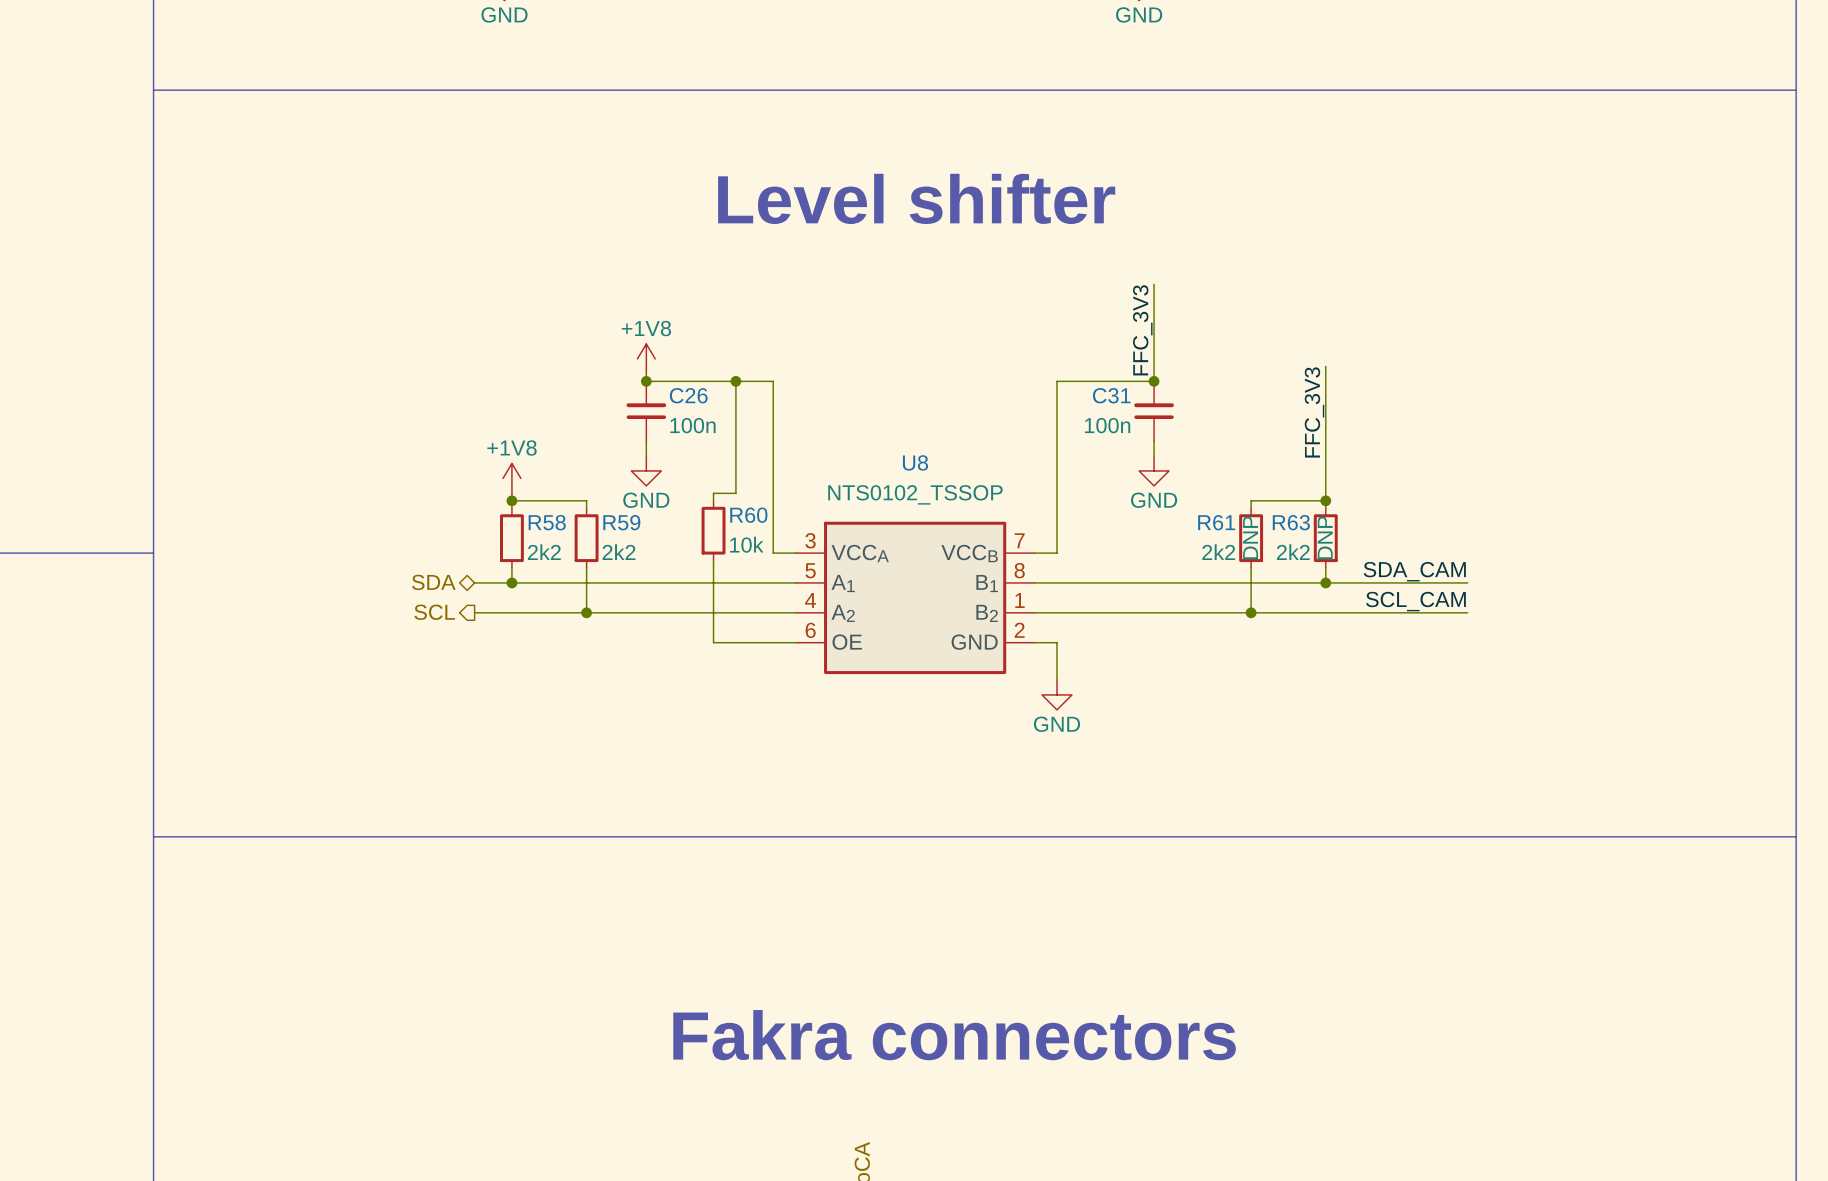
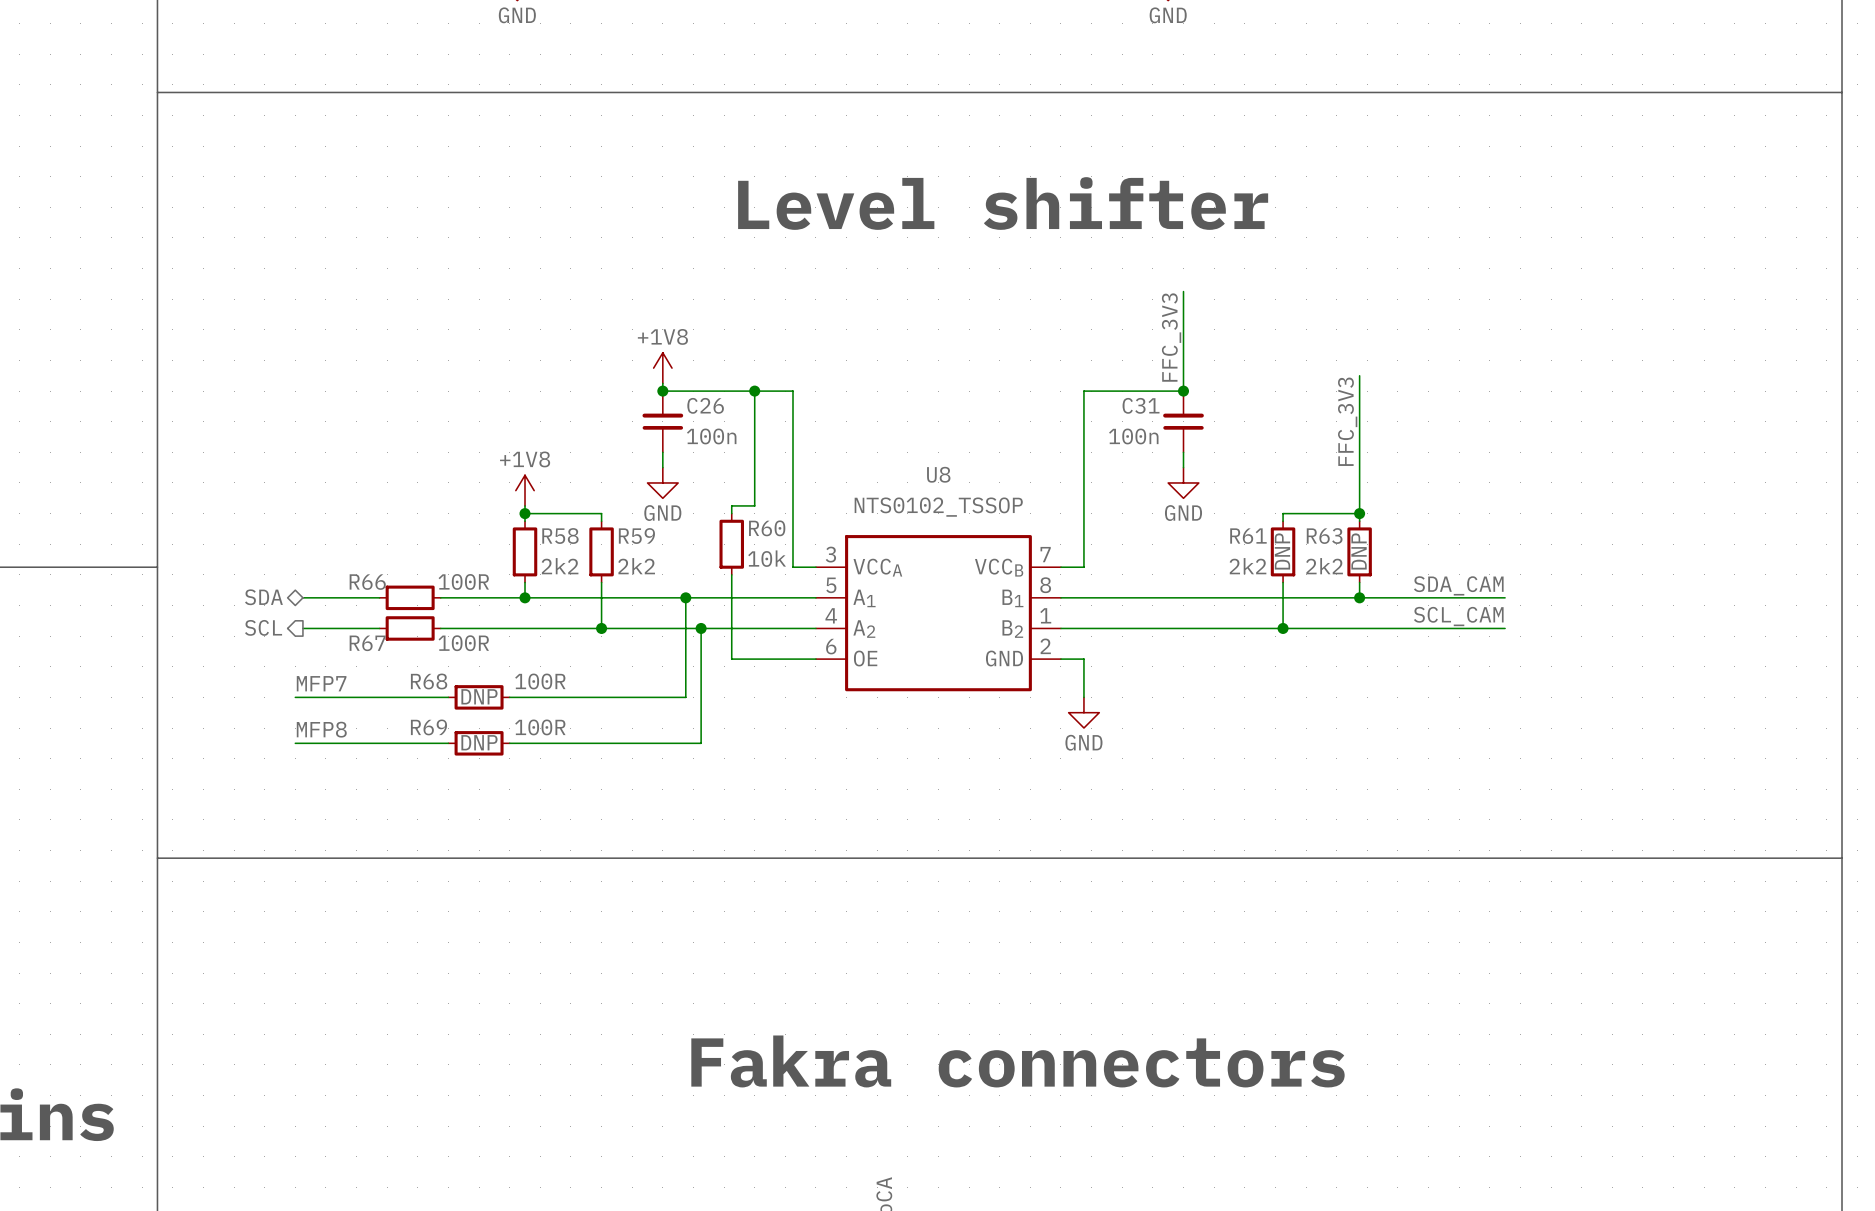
wire: none -> (302, 597) (379, 597)
R66: none -> (410, 597)
wire: none -> (440, 597) (486, 597)
hierarchical label position: SDA (433, 582) -> SDA (263, 597)
wire: none -> (685, 597) (685, 697) (509, 697)
junction: none -> (685, 597)
wire: none -> (302, 628) (379, 628)
R67: none -> (410, 628)
wire: none -> (440, 628) (486, 628)
hierarchical label position: SCL (434, 612) -> SCL (263, 627)
wire: none -> (701, 628) (701, 743) (509, 743)
junction: none -> (701, 628)
label: none -> MFP7 (321, 683)
wire: none -> (295, 697) (448, 697)
R68: none -> (479, 697)
label: none -> MFP8 (321, 729)
wire: none -> (295, 743) (448, 743)
R69: none -> (479, 743)

